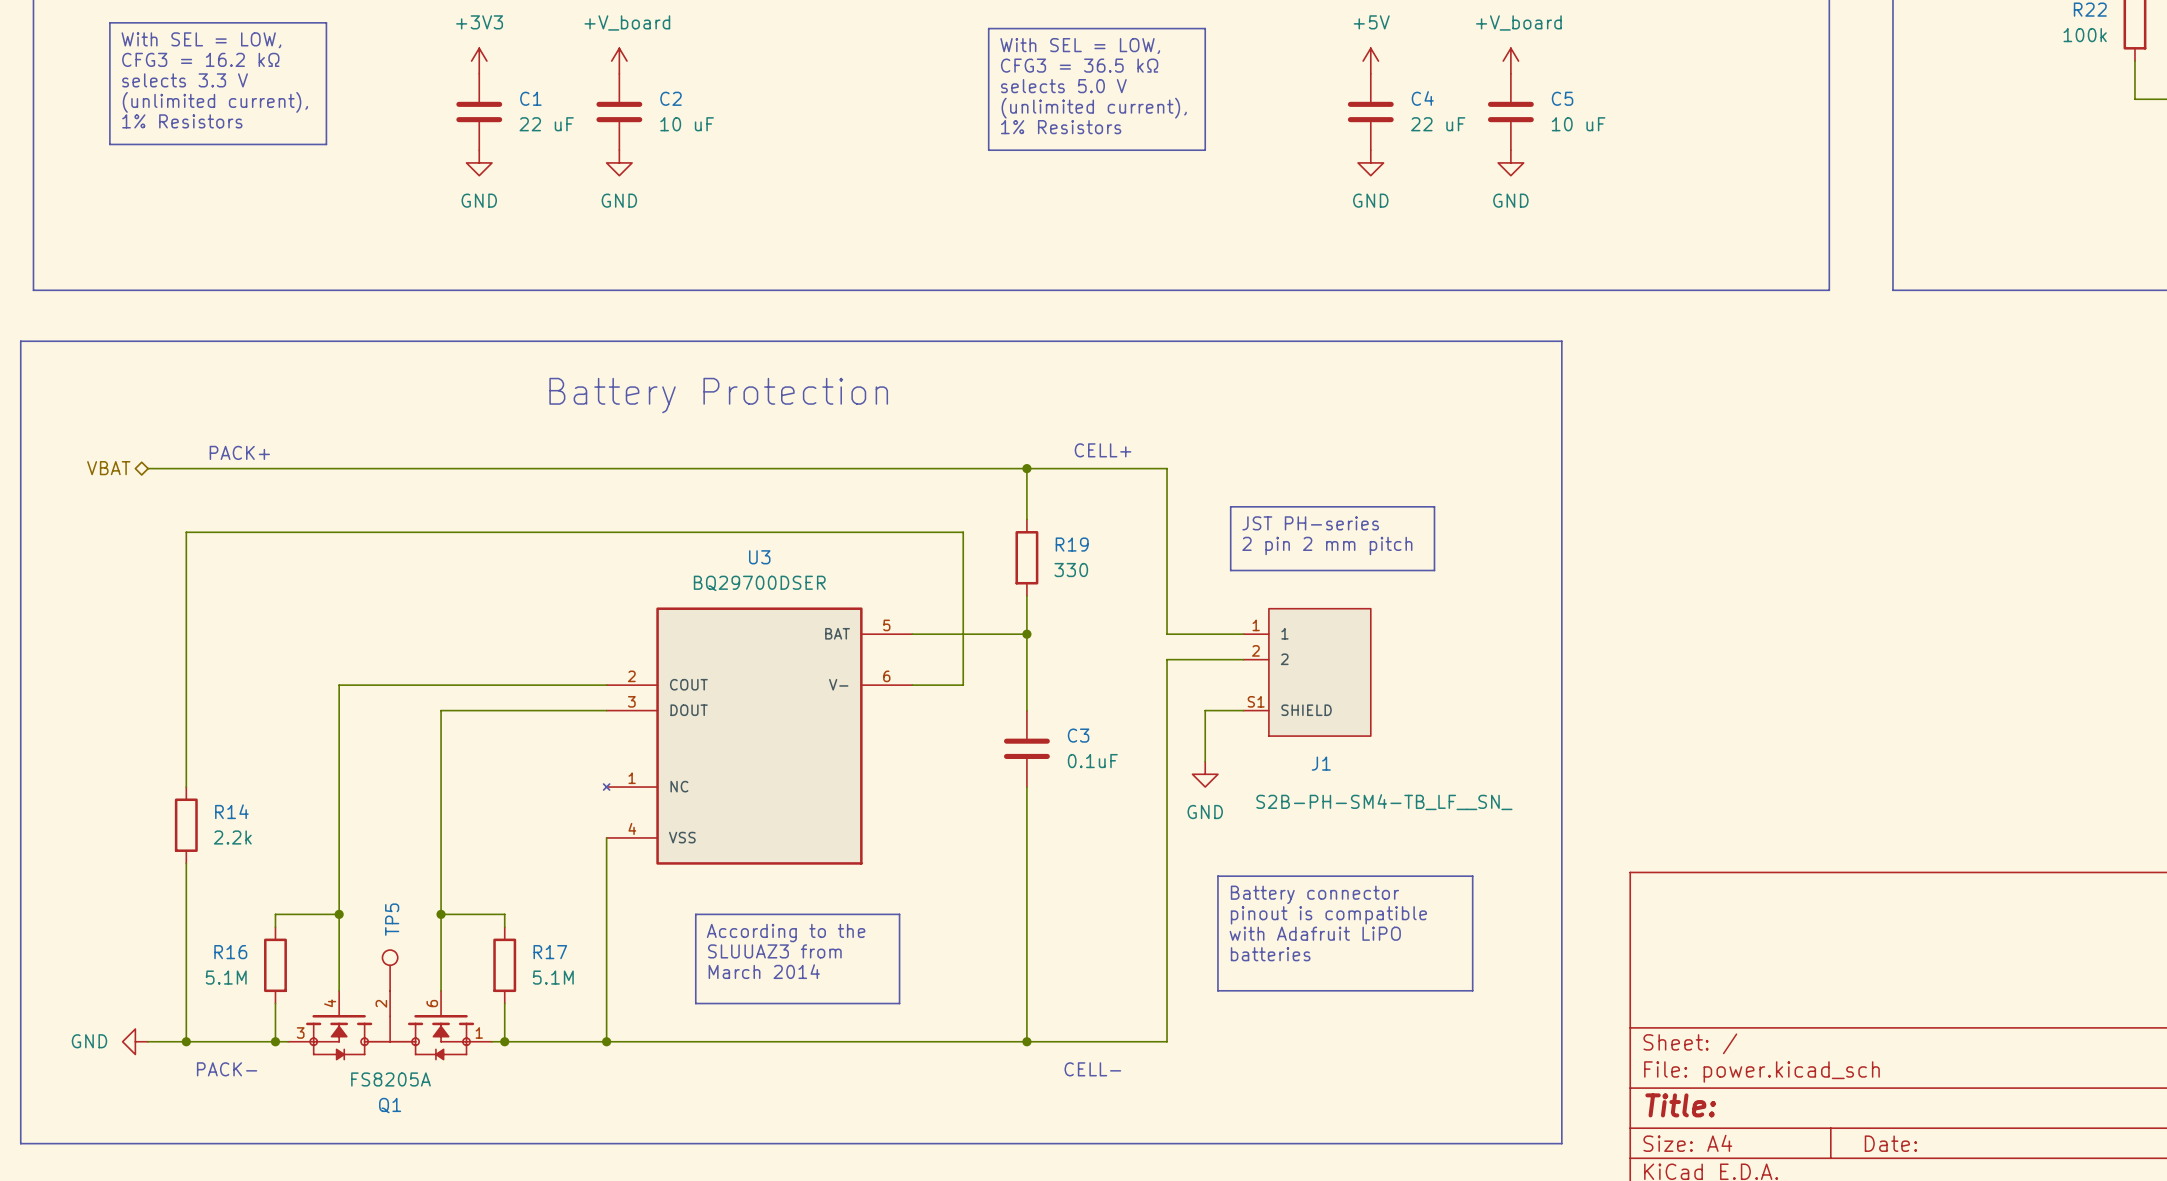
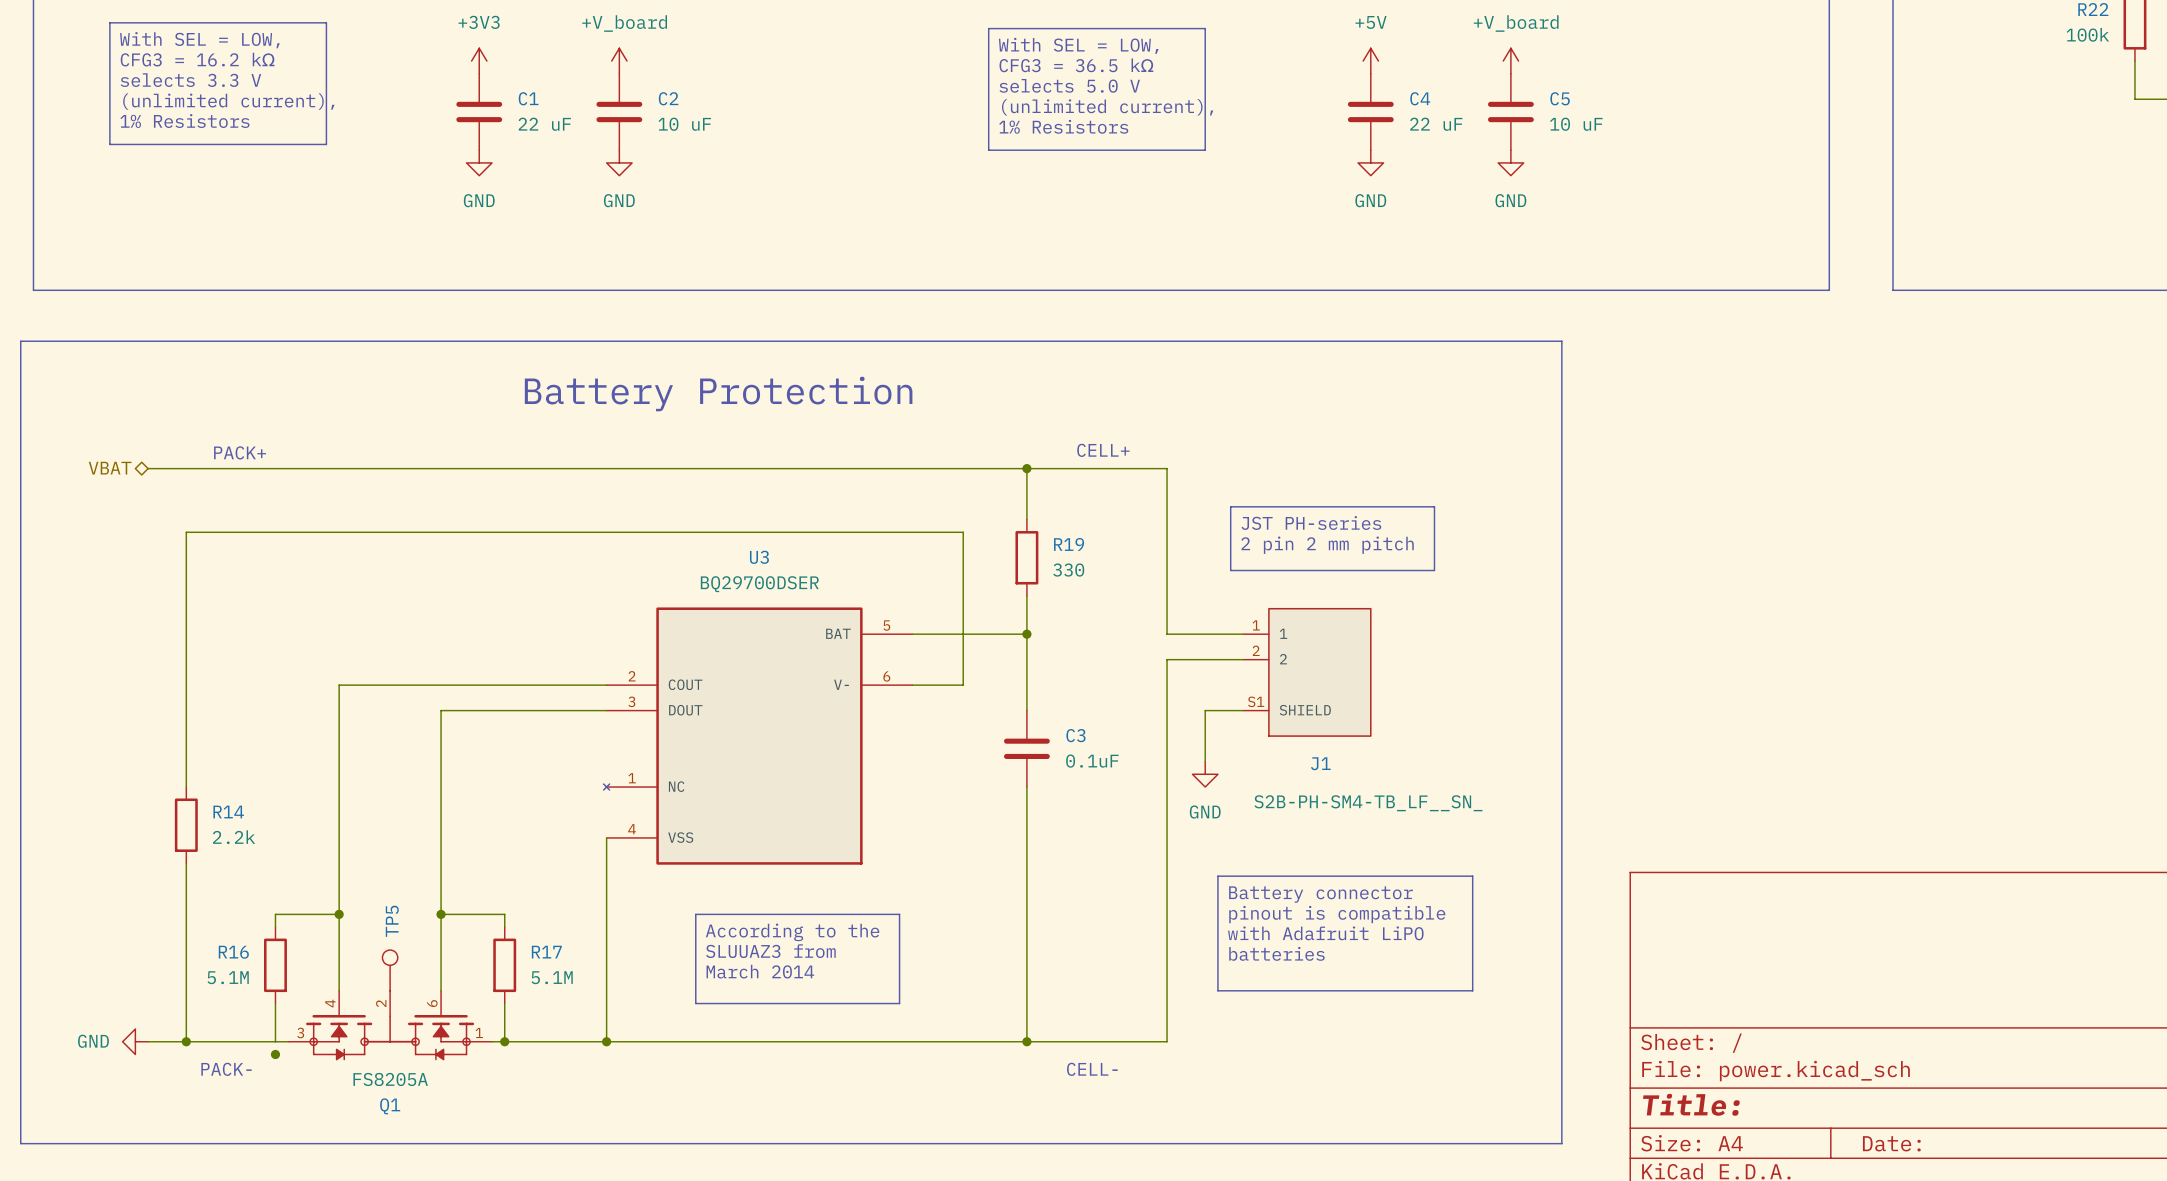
junction position: (275, 1041) -> (275, 1054)

